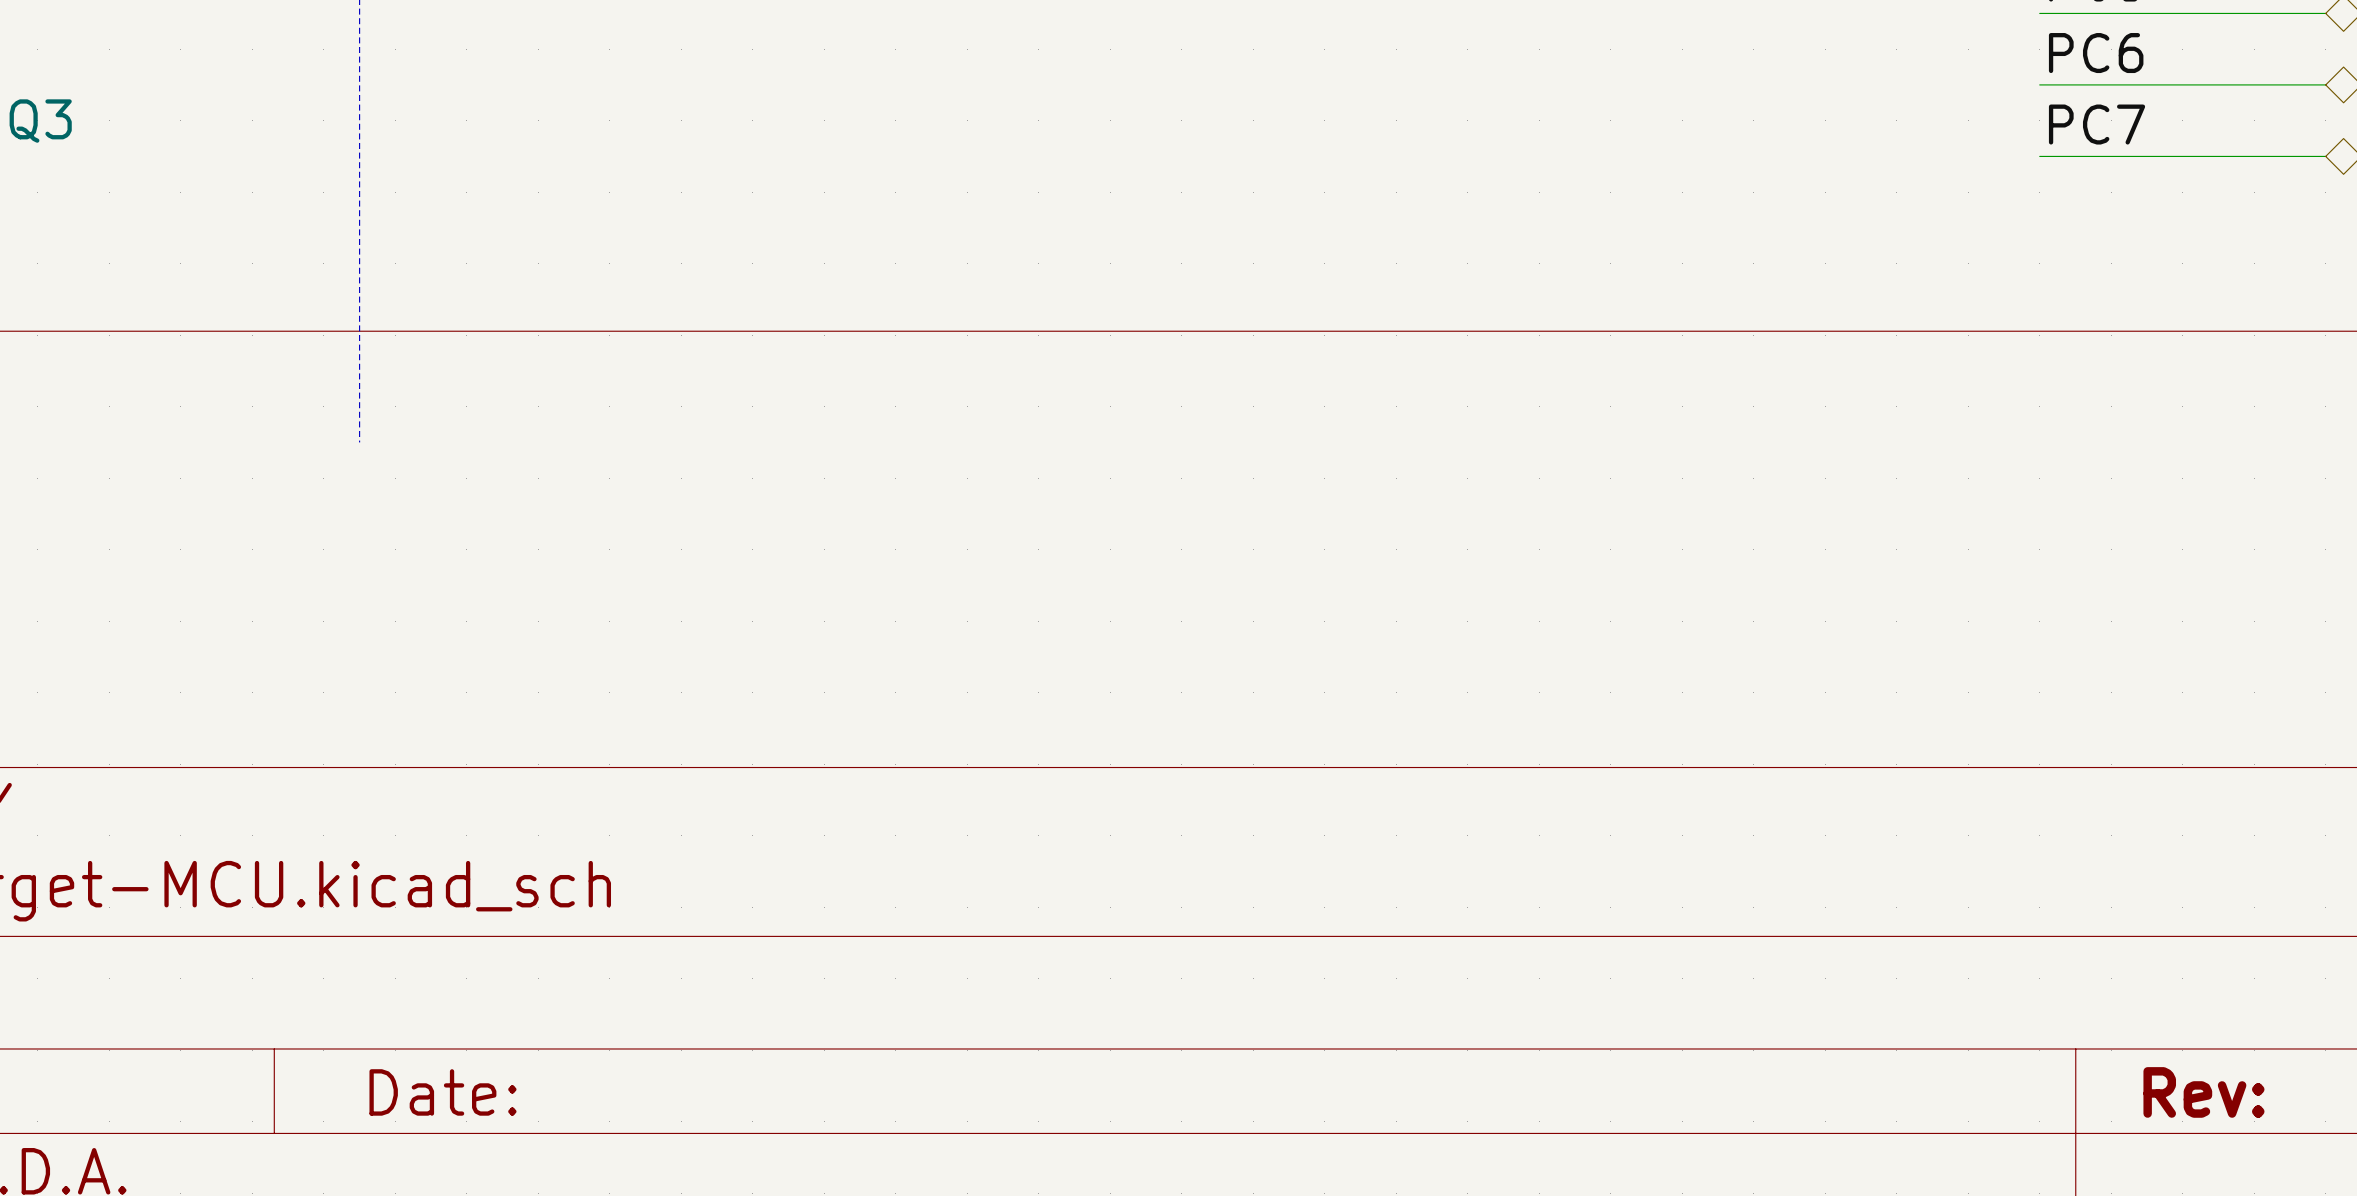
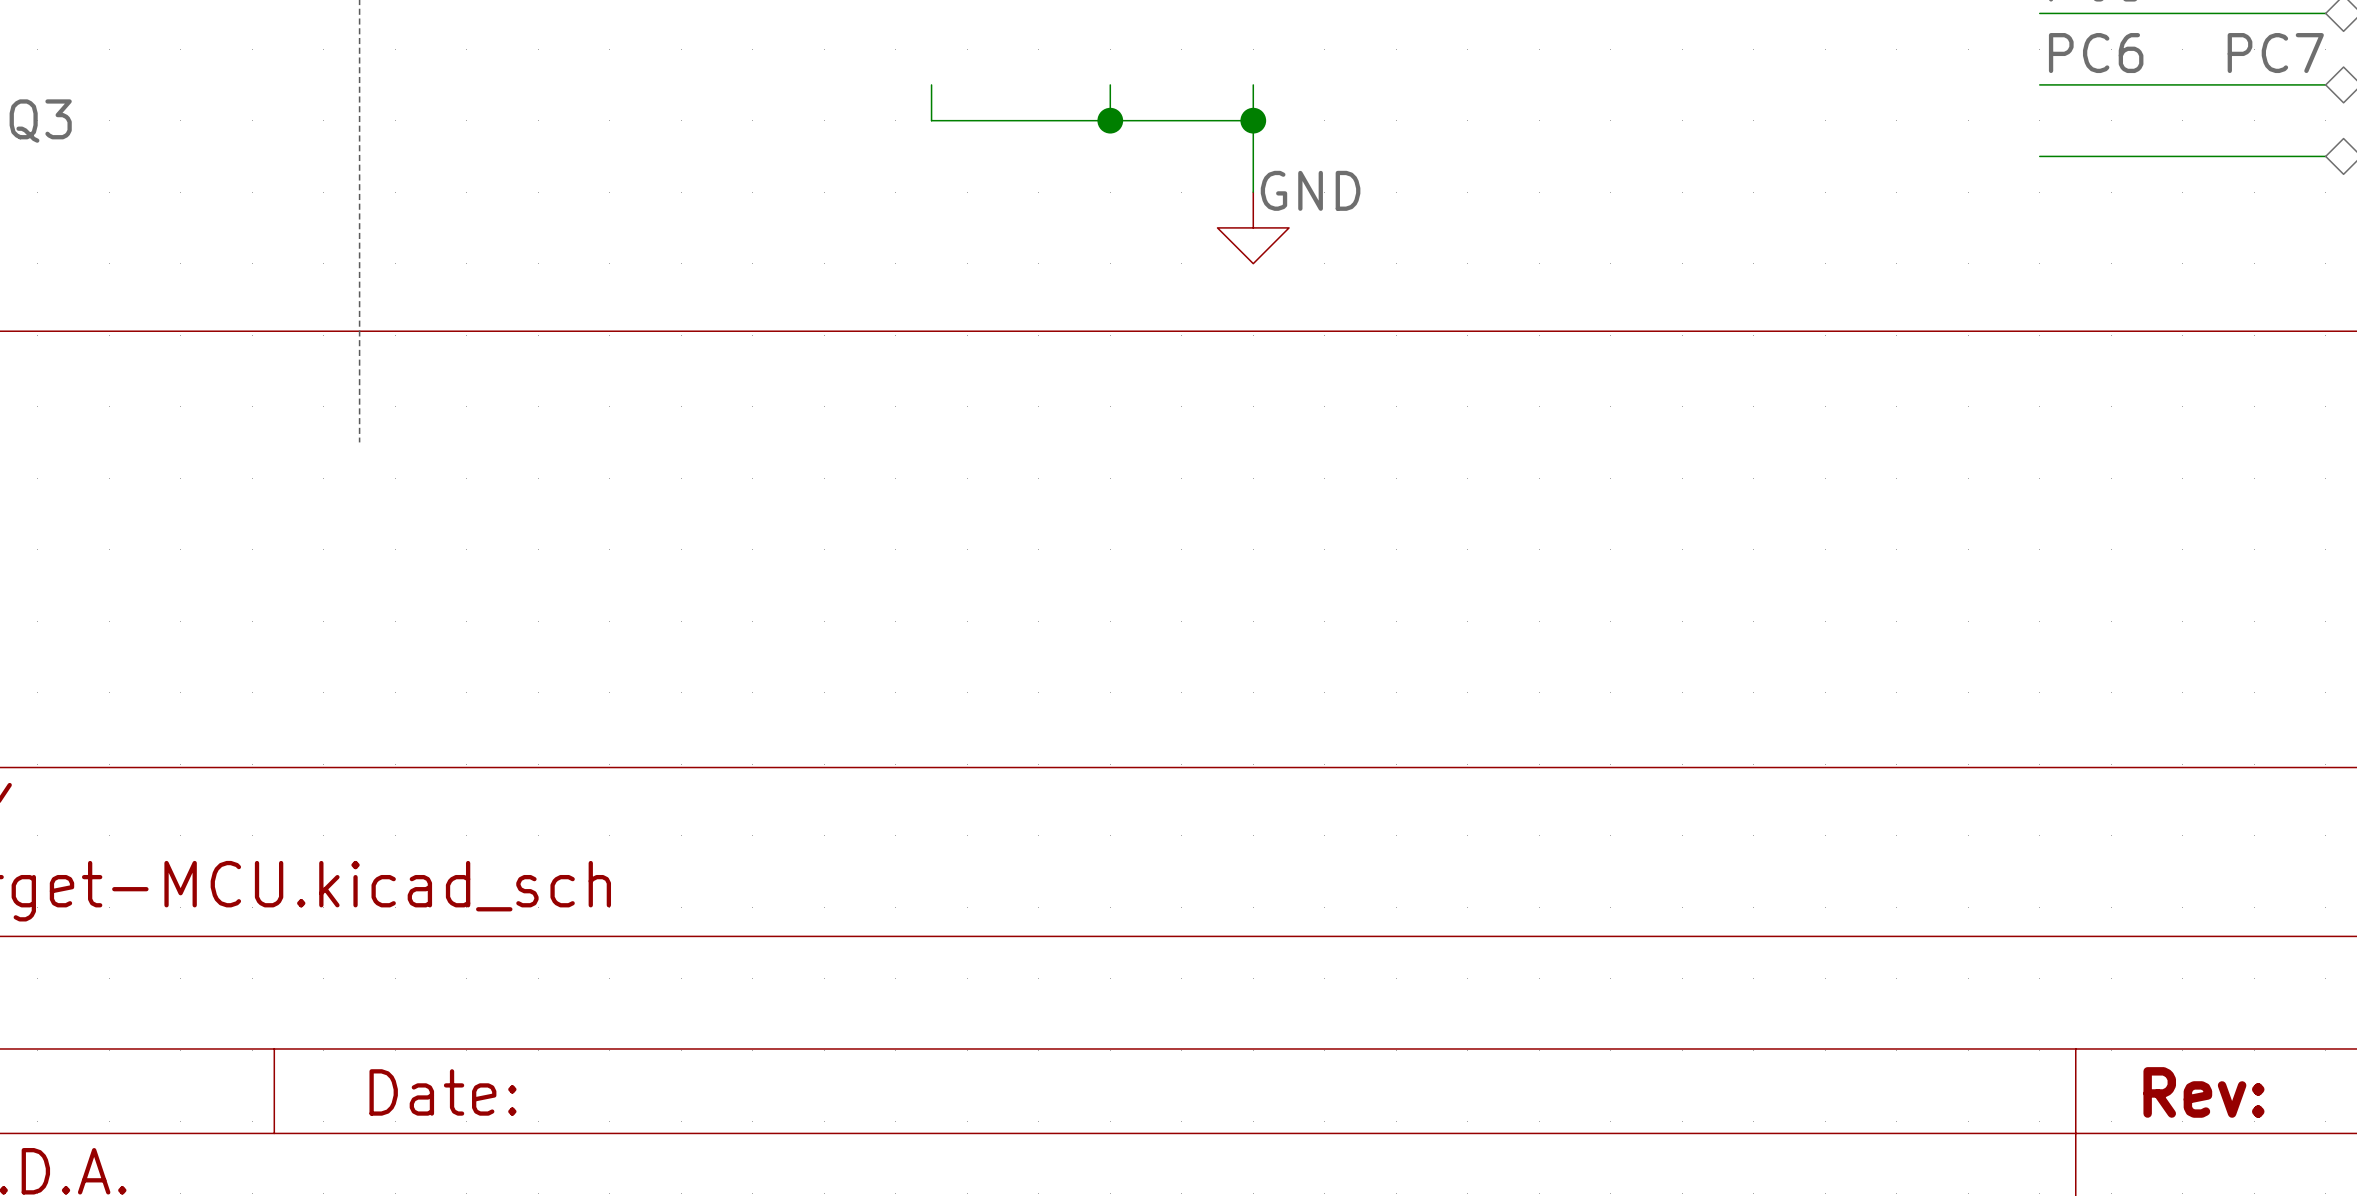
wire: none -> (931, 84) (931, 120) (1253, 120)
wire: none -> (1110, 84) (1110, 120)
wire: none -> (1253, 84) (1253, 192)
junction: none -> (1110, 120)
junction: none -> (1253, 120)
label position: PC7 (2097, 124) -> PC7 (2275, 53)
power symbol: none -> GND (1253, 227)

